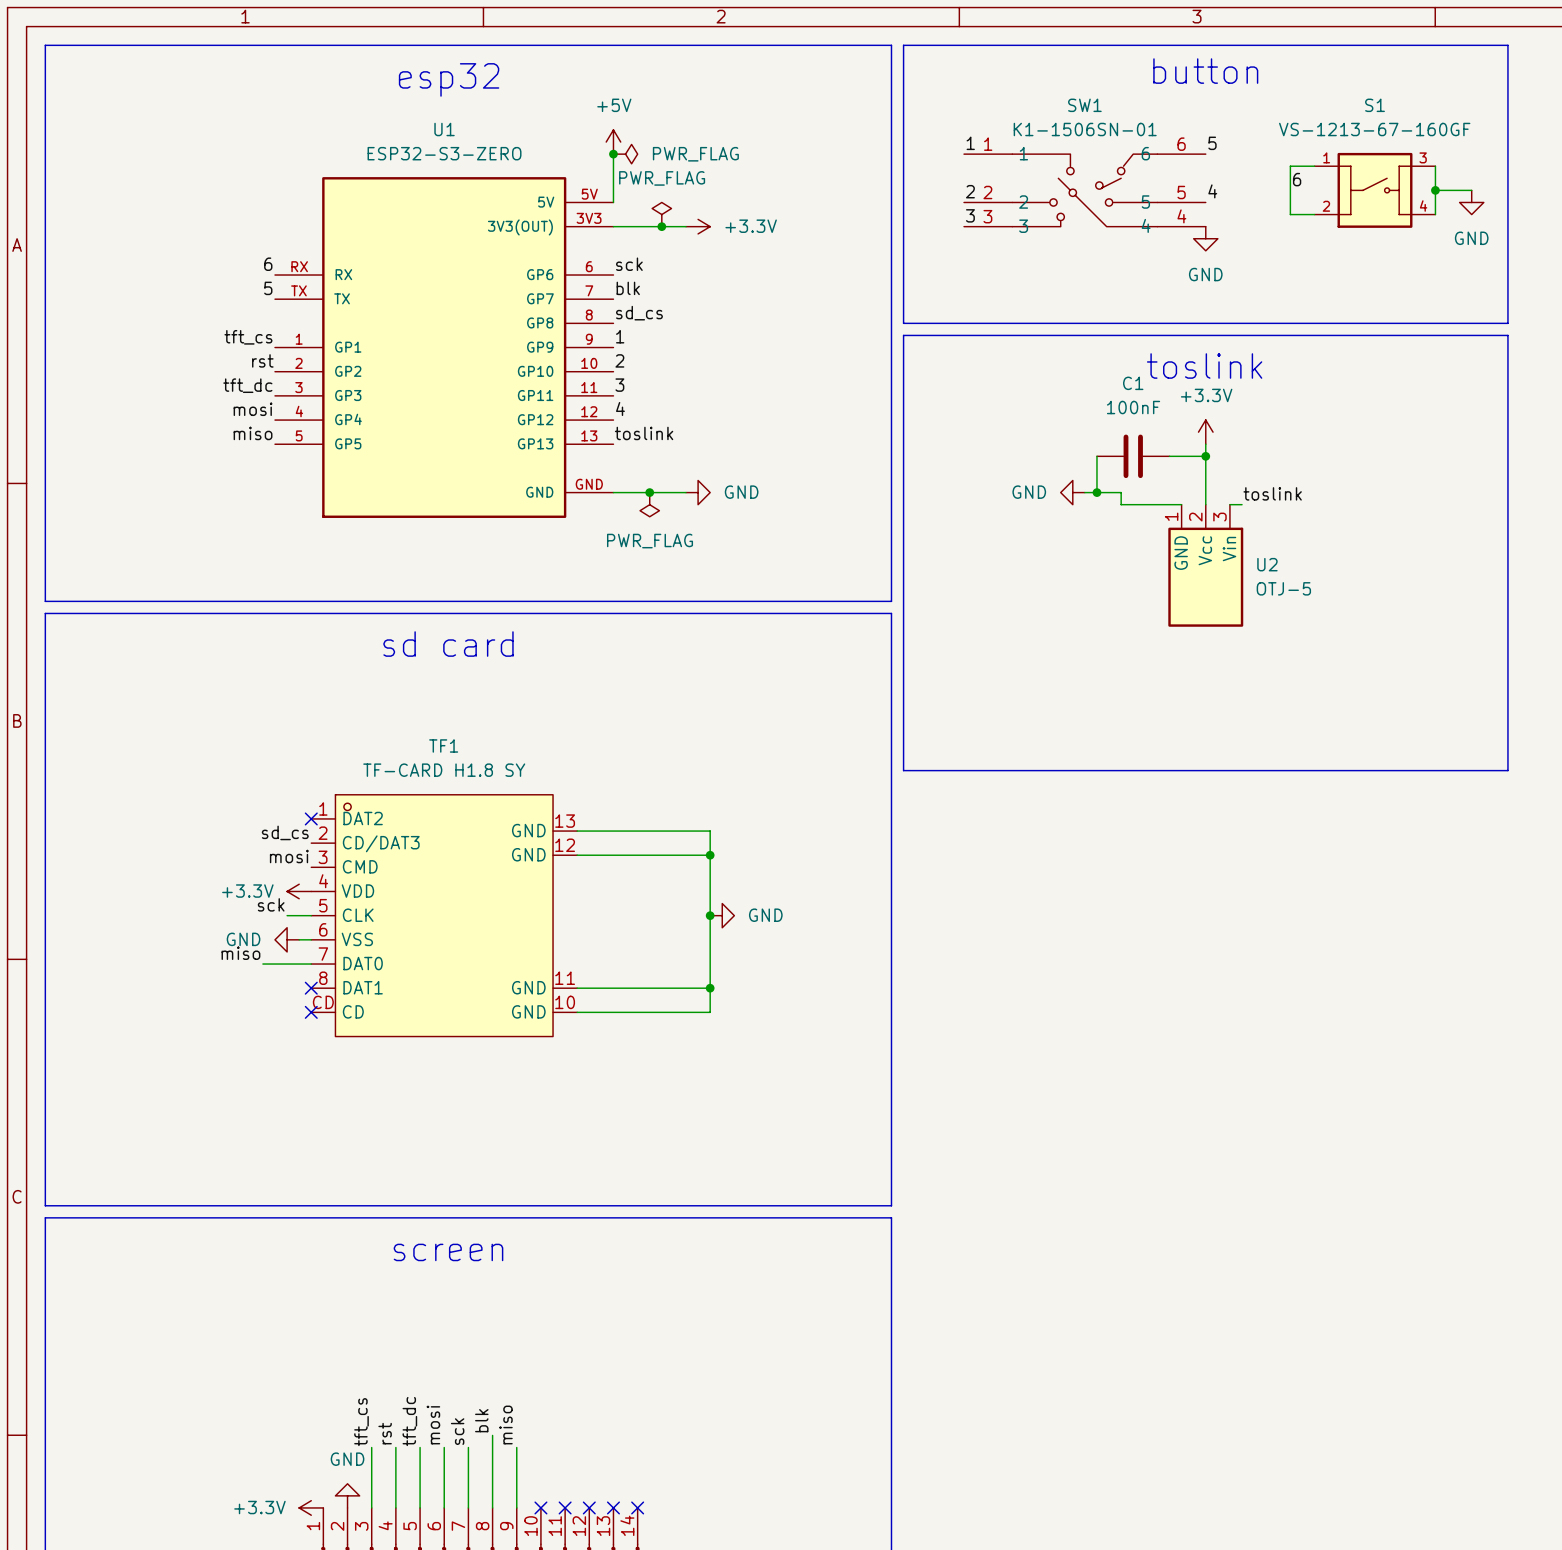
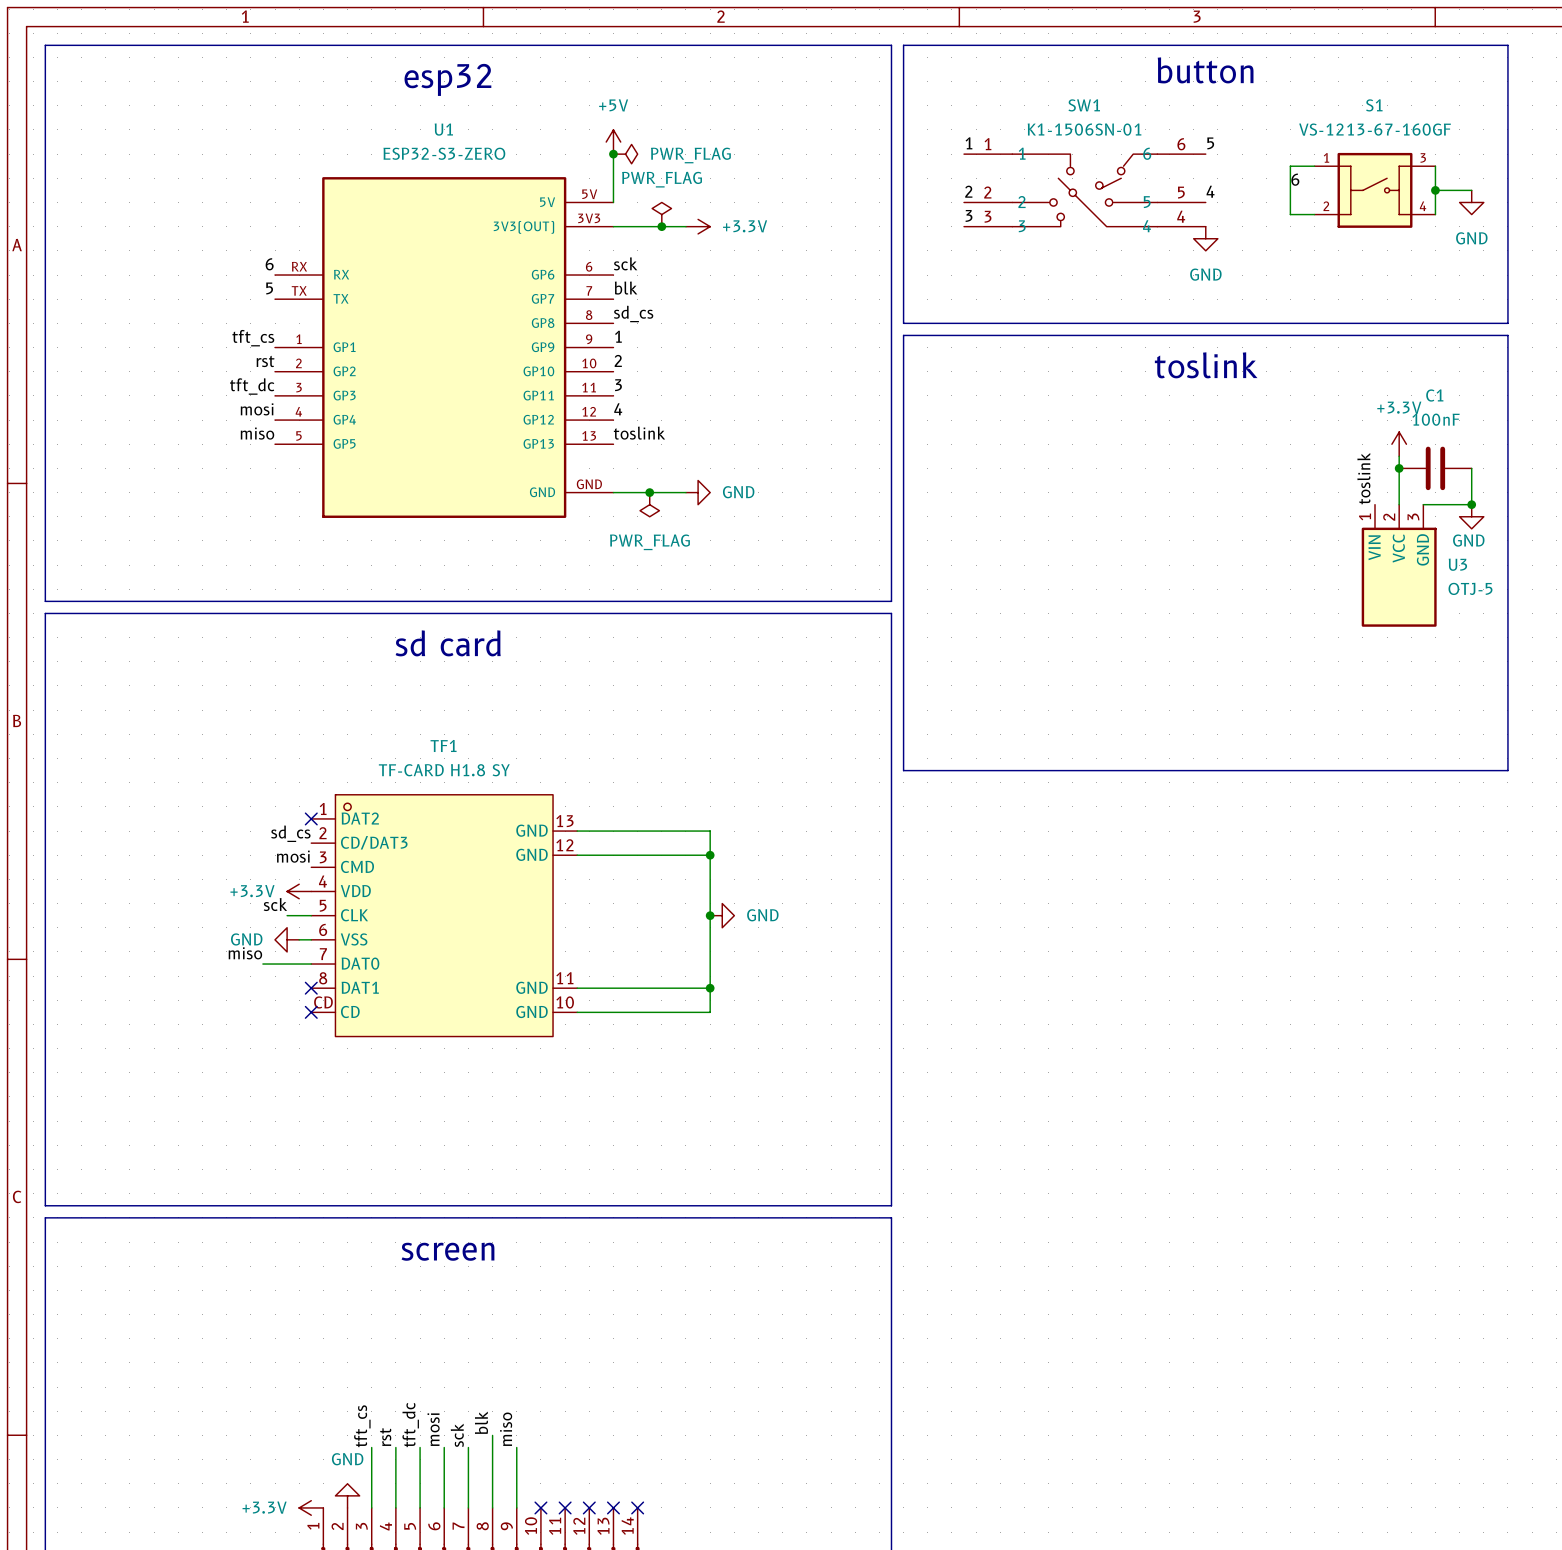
power symbol position: +3.3V (1205, 432) -> +3.3V (1399, 444)
wire: (1205, 444) (1205, 504) -> none
wire: (1096, 456) (1096, 492) -> none
C1 position: (1133, 456) -> (1435, 468)
wire: (1169, 456) (1205, 456) -> none
junction: (1205, 456) -> none
wire: none -> (1399, 456) (1399, 504)
junction: none -> (1399, 468)
wire: none -> (1471, 468) (1471, 504) (1423, 504)
power symbol: GND (1072, 492) -> none
wire: (1084, 492) (1121, 492) (1121, 504) (1181, 504) -> none
junction: (1096, 492) -> none
label rotation: 0° (1272, 493) -> 90° counterclockwise (1363, 478)
label position: toslink (1272, 493) -> toslink (1363, 478)
wire: (1229, 504) (1242, 504) -> none
junction: none -> (1471, 504)
power symbol: none -> GND (1471, 516)
U2: OTJ-5 (1205, 565) -> none
U3: none -> OTJ-5 (1399, 565)

